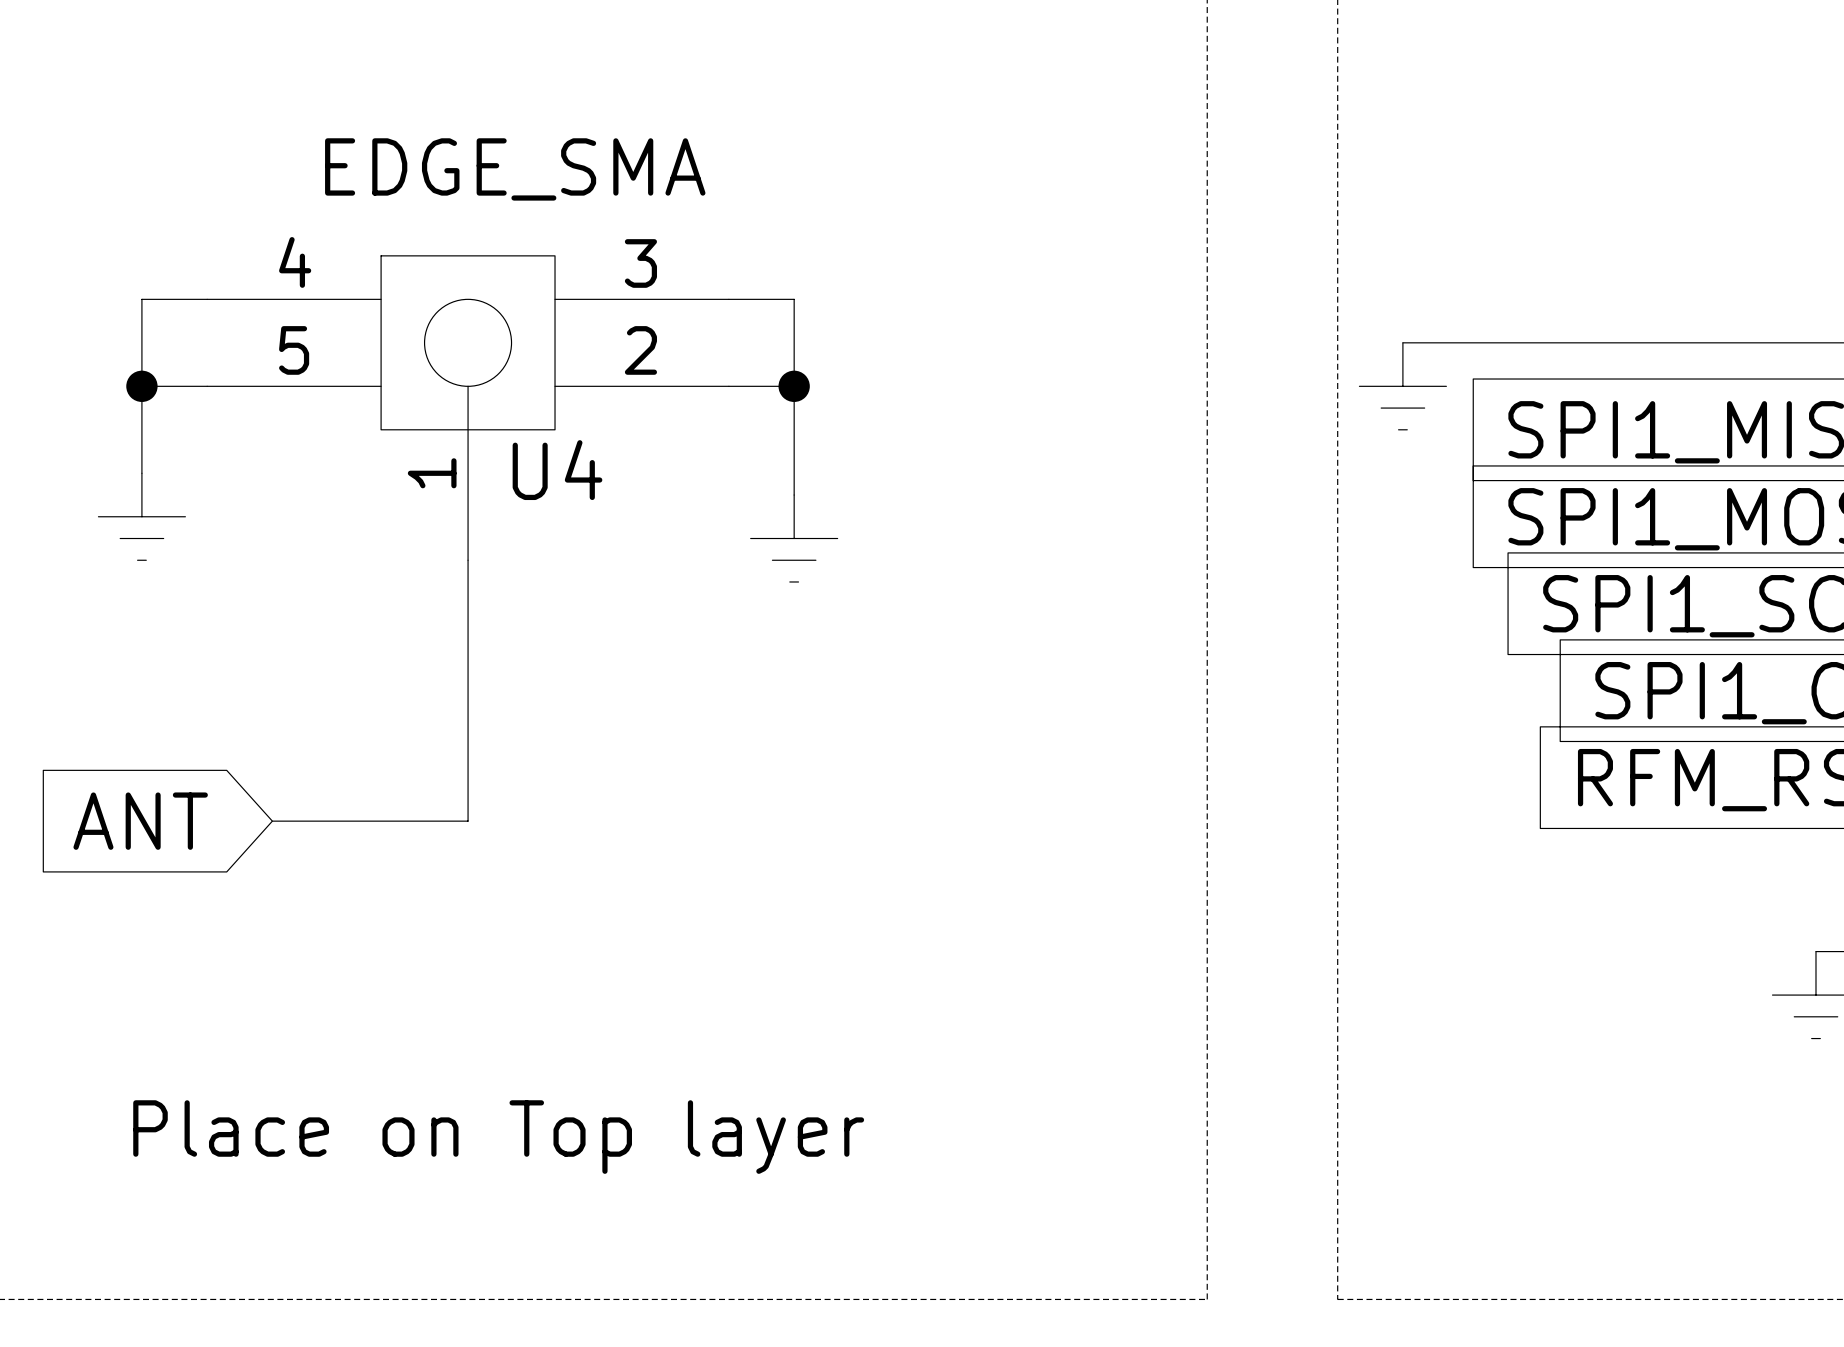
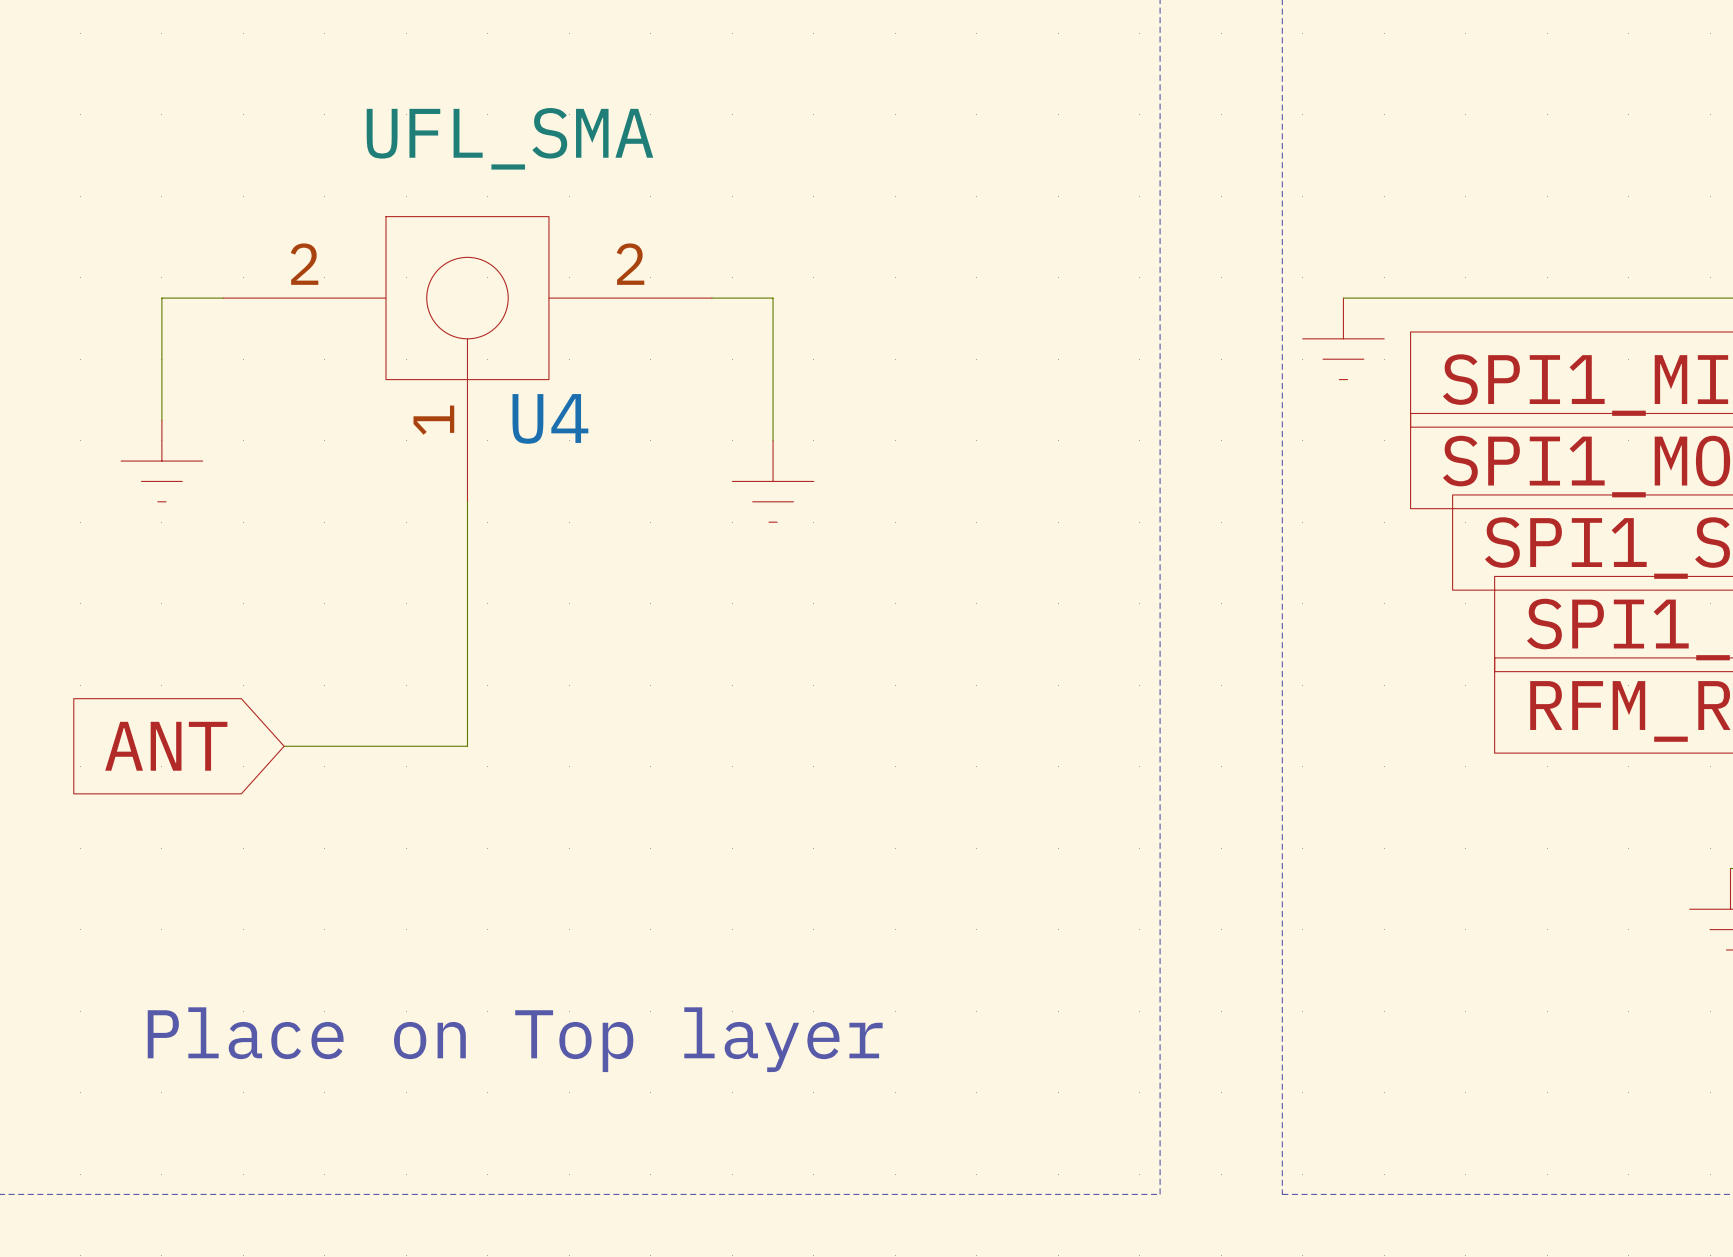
U4 value: EDGE_SMA (515, 169) -> UFL_SMA (509, 138)
U4 symbol: [207, 255, 729, 561] -> [223, 216, 712, 502]
wire: (207, 299) (141, 299) (141, 342) -> (223, 298) (161, 298)
wire: (728, 299) (794, 299) (794, 342) -> (711, 298) (773, 298)
wire: (141, 386) (207, 386) -> none
junction: (141, 386) -> none
wire: (728, 386) (794, 386) -> none
junction: (794, 386) -> none

